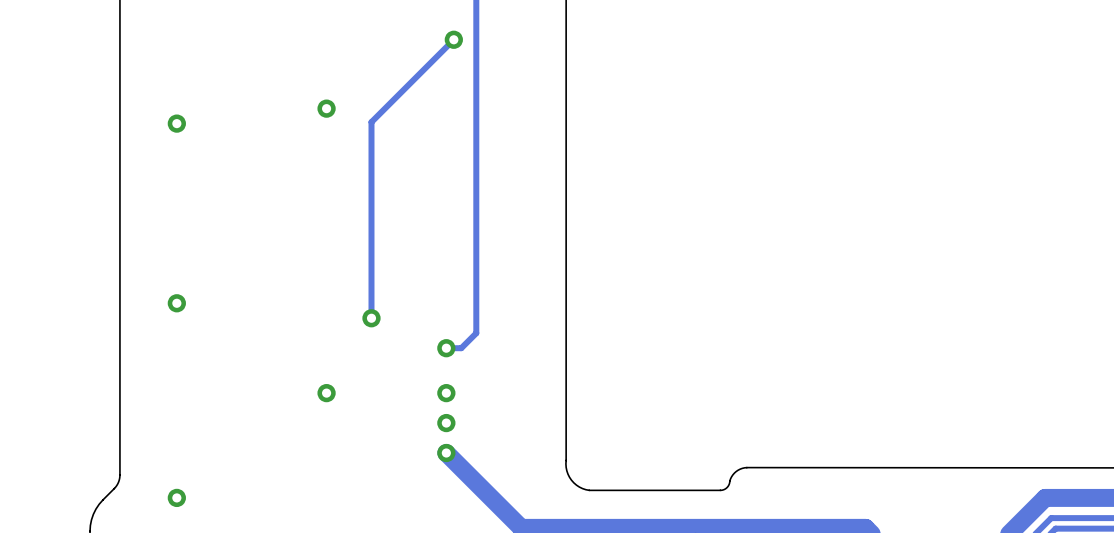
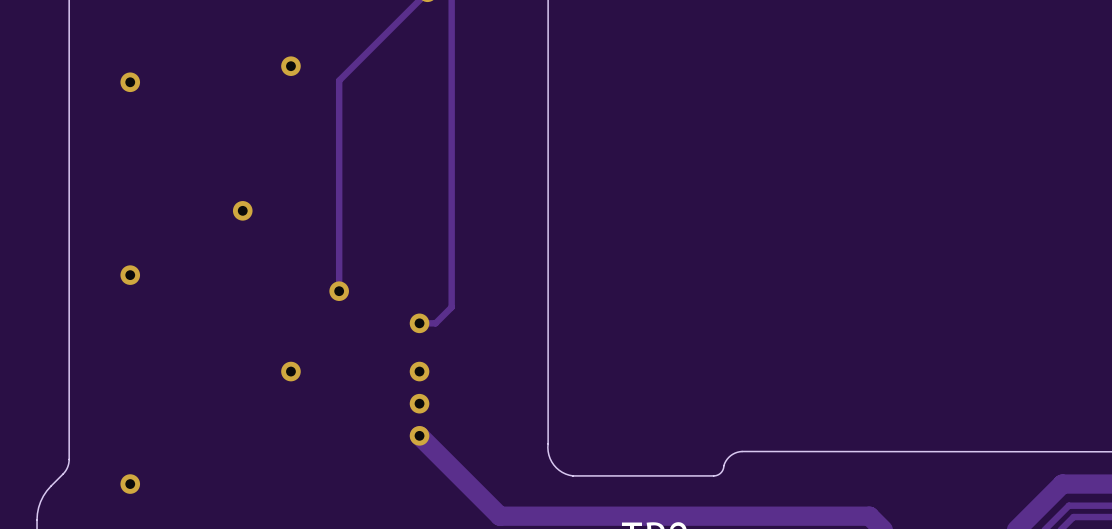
via: none -> (242, 210)

